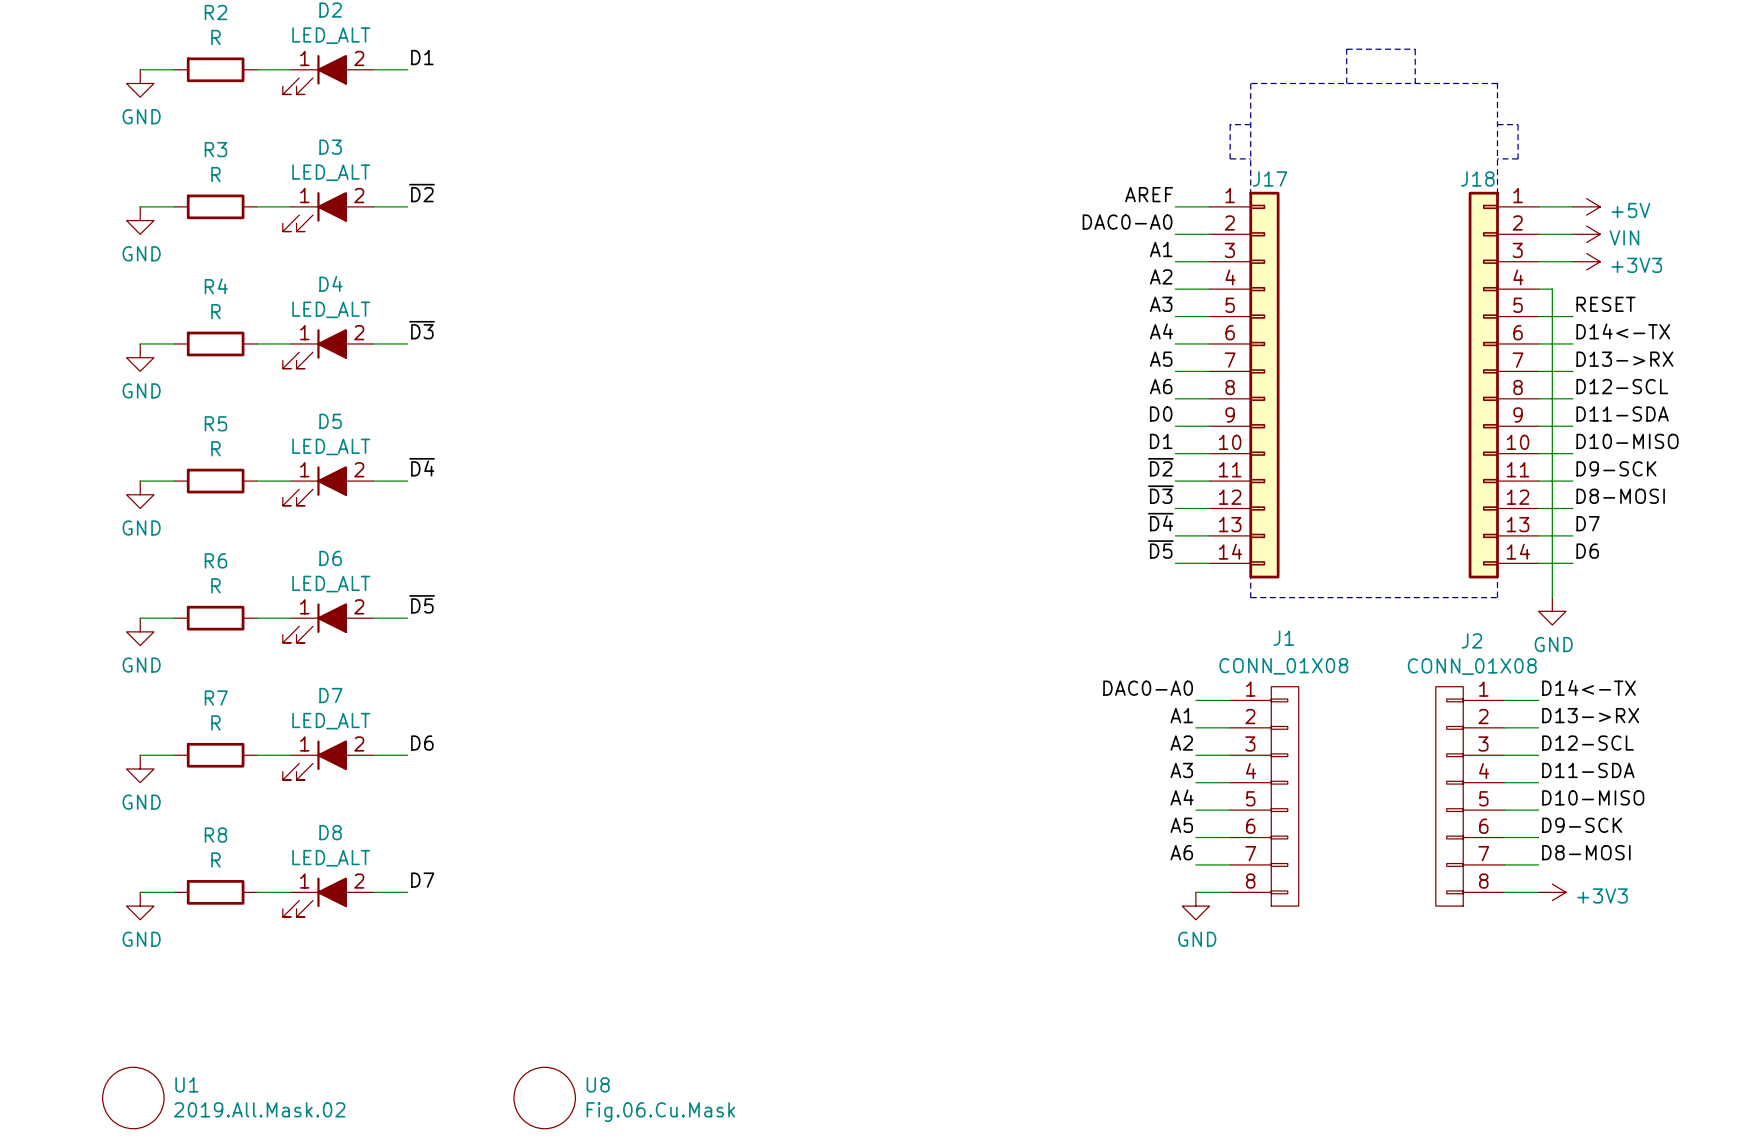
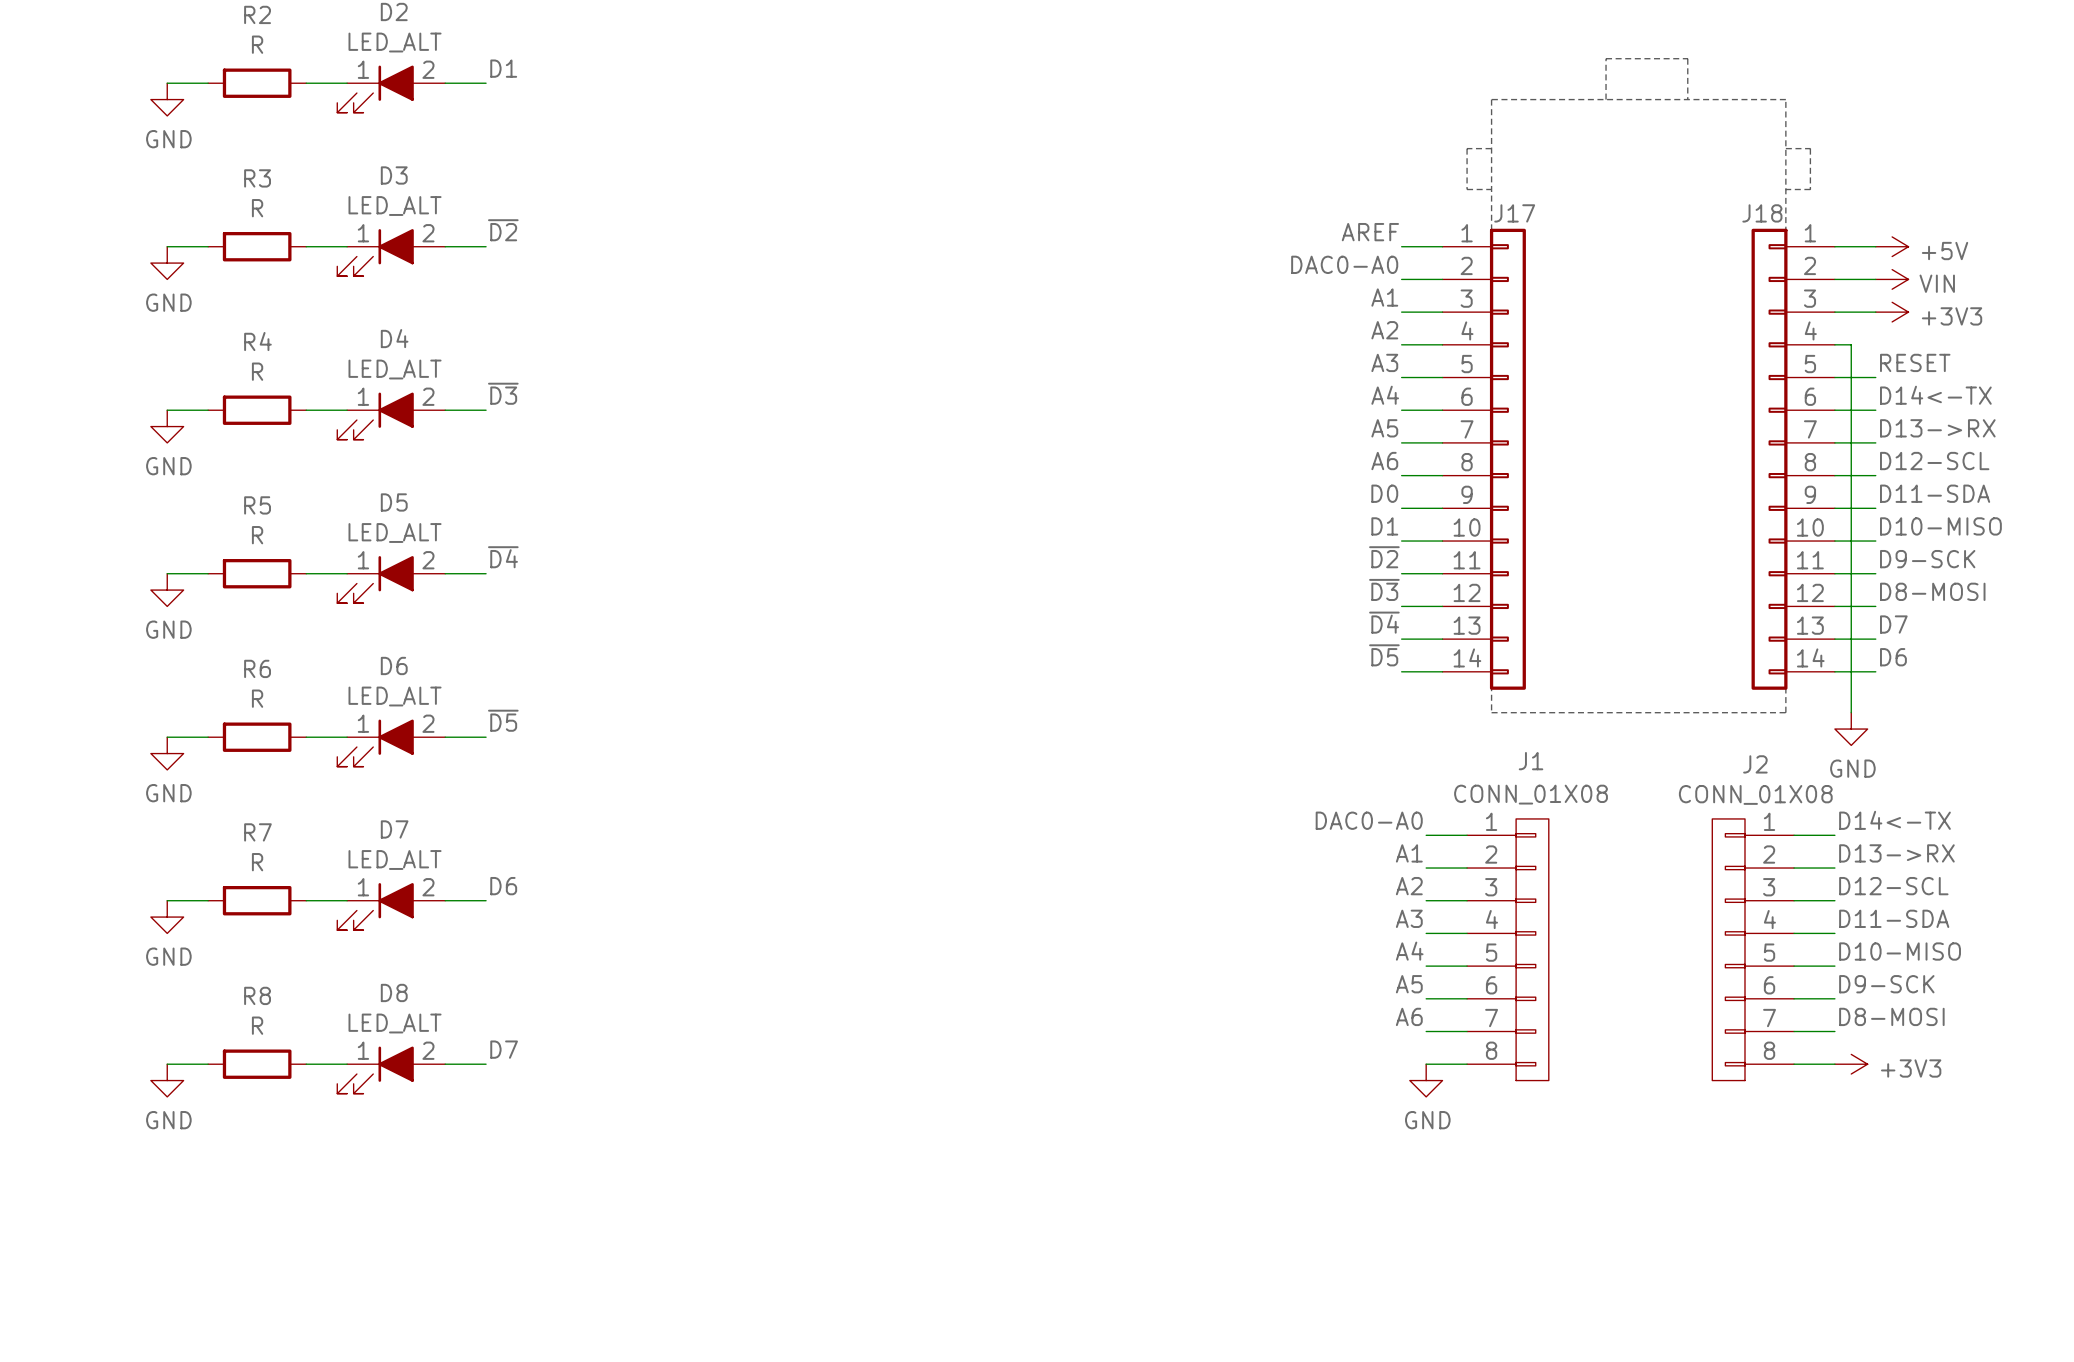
U1: 2019.All.Mask.02 (133, 1098) -> none
U8: Fig.06.Cu.Mask (544, 1098) -> none

